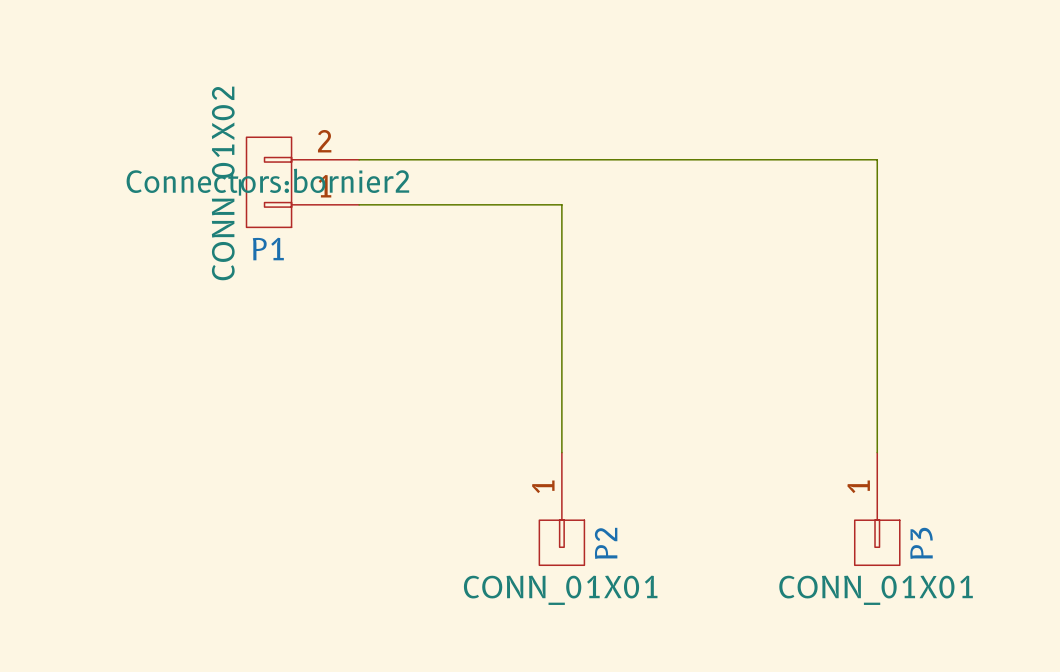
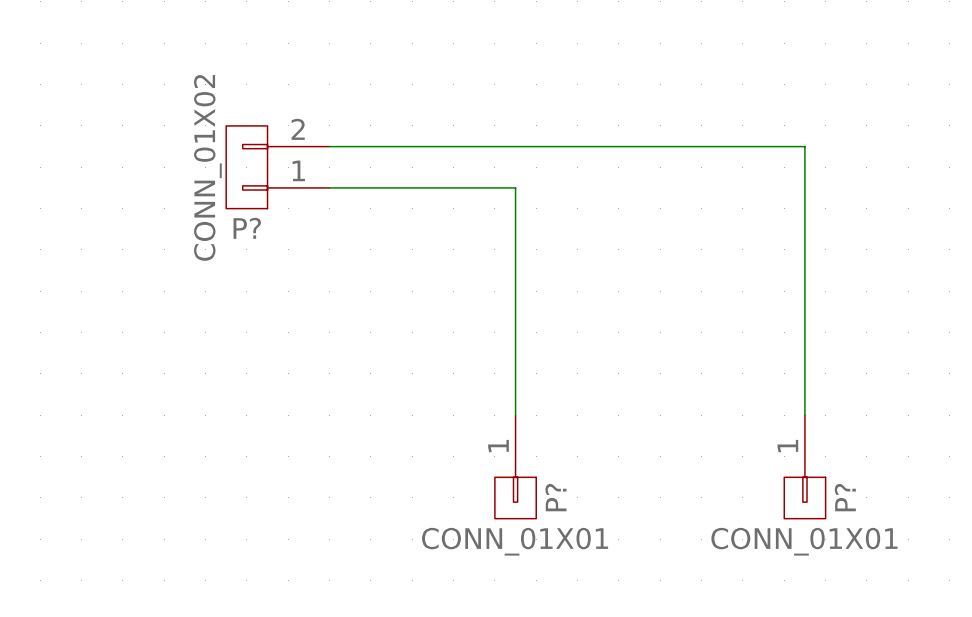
P1 text: Connectors:bornier2 (267, 180) -> none
P1 name: P1 (268, 249) -> P? (247, 228)
P2 name: P2 (606, 543) -> P? (555, 497)
P3 name: P3 (921, 543) -> P? (845, 497)

